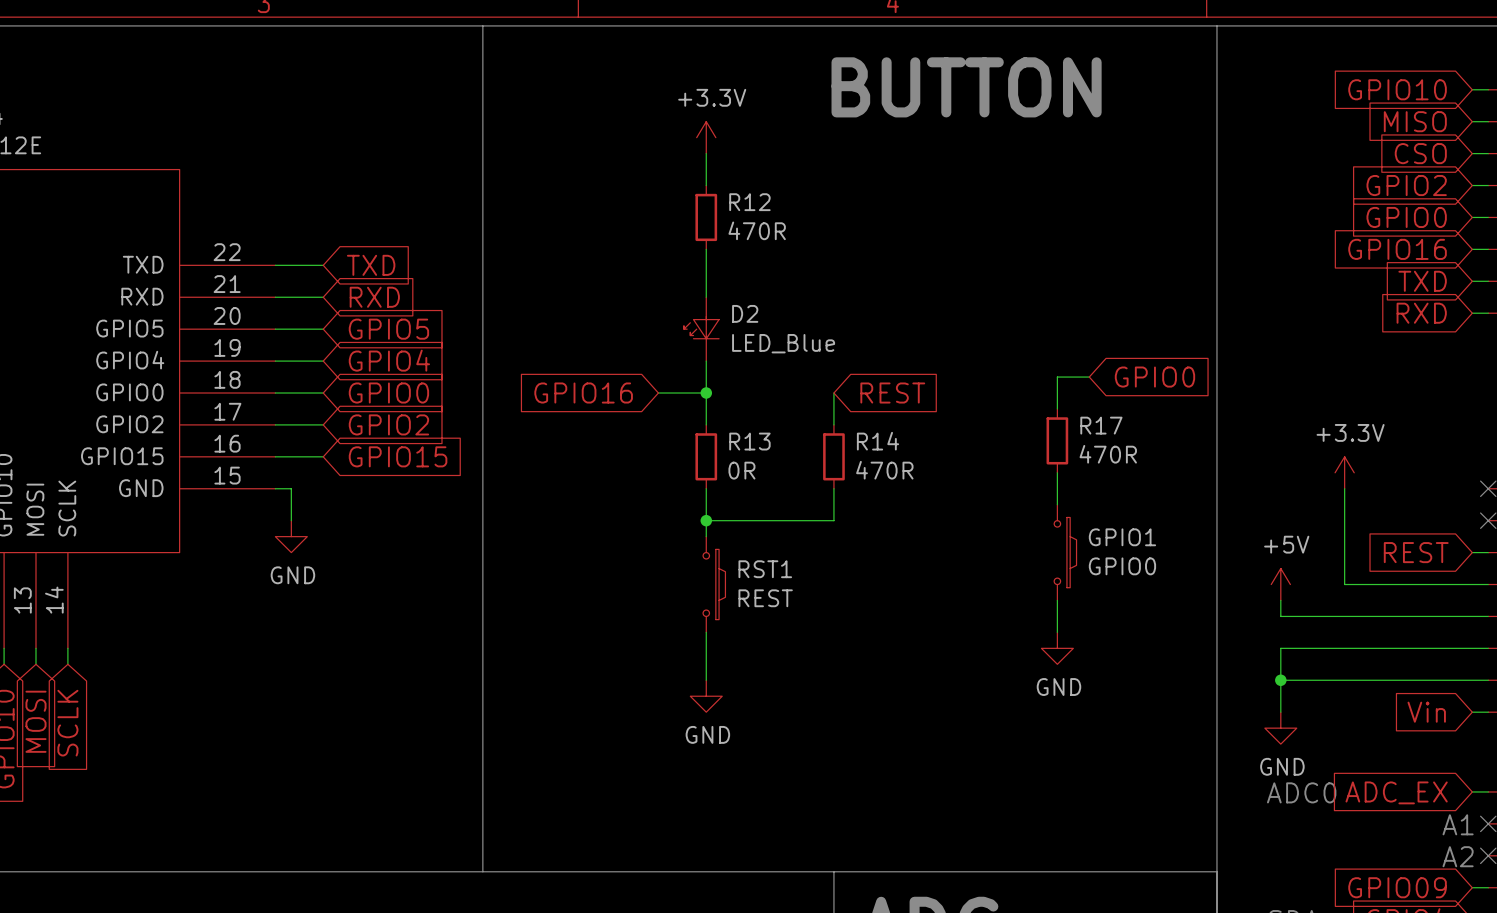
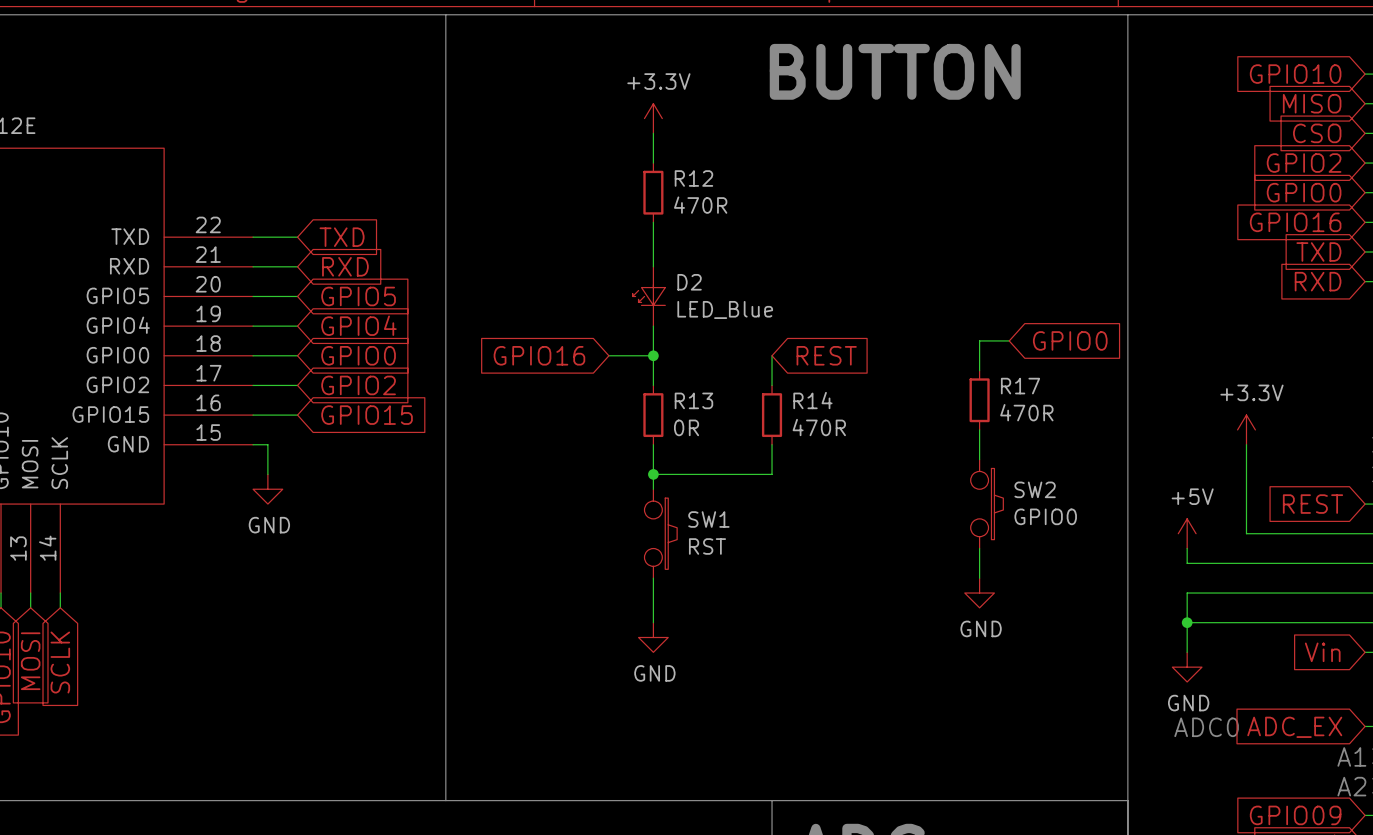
GPIO1: GPIO0 (1065, 552) -> none
SW2: none -> GPIO0 (987, 504)
RST1: REST (714, 584) -> none
SW1: none -> RST (660, 533)

